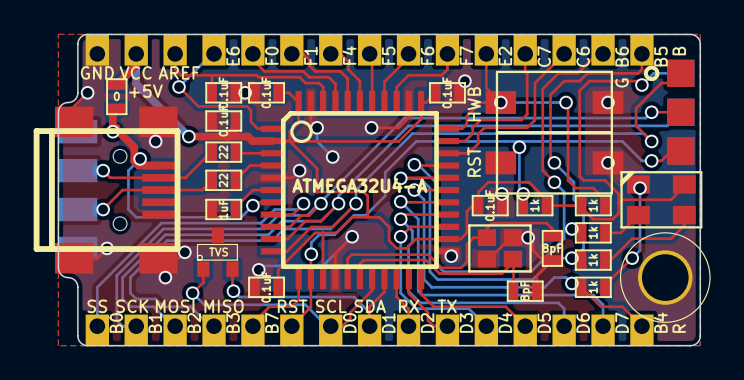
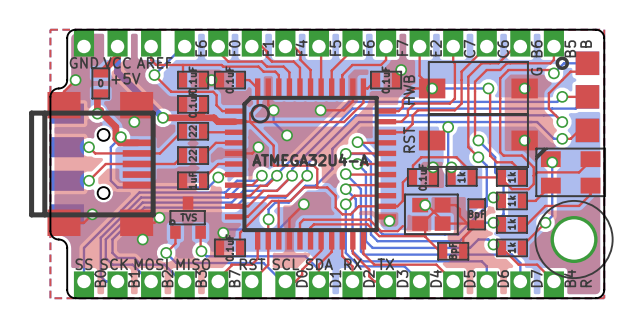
top track: (552, 236) (552, 228) (546, 223) (492, 223) (486, 228) (486, 237) (473, 237) (466, 244) (466, 262) -> none
top track: none -> (425, 205) (445, 223) (476, 224)
via position: (528, 237) -> (425, 205)
top track: (492, 273) (501, 273) (512, 262) (512, 259) (513, 291) -> (425, 223) (425, 236) (439, 251) (443, 251)

